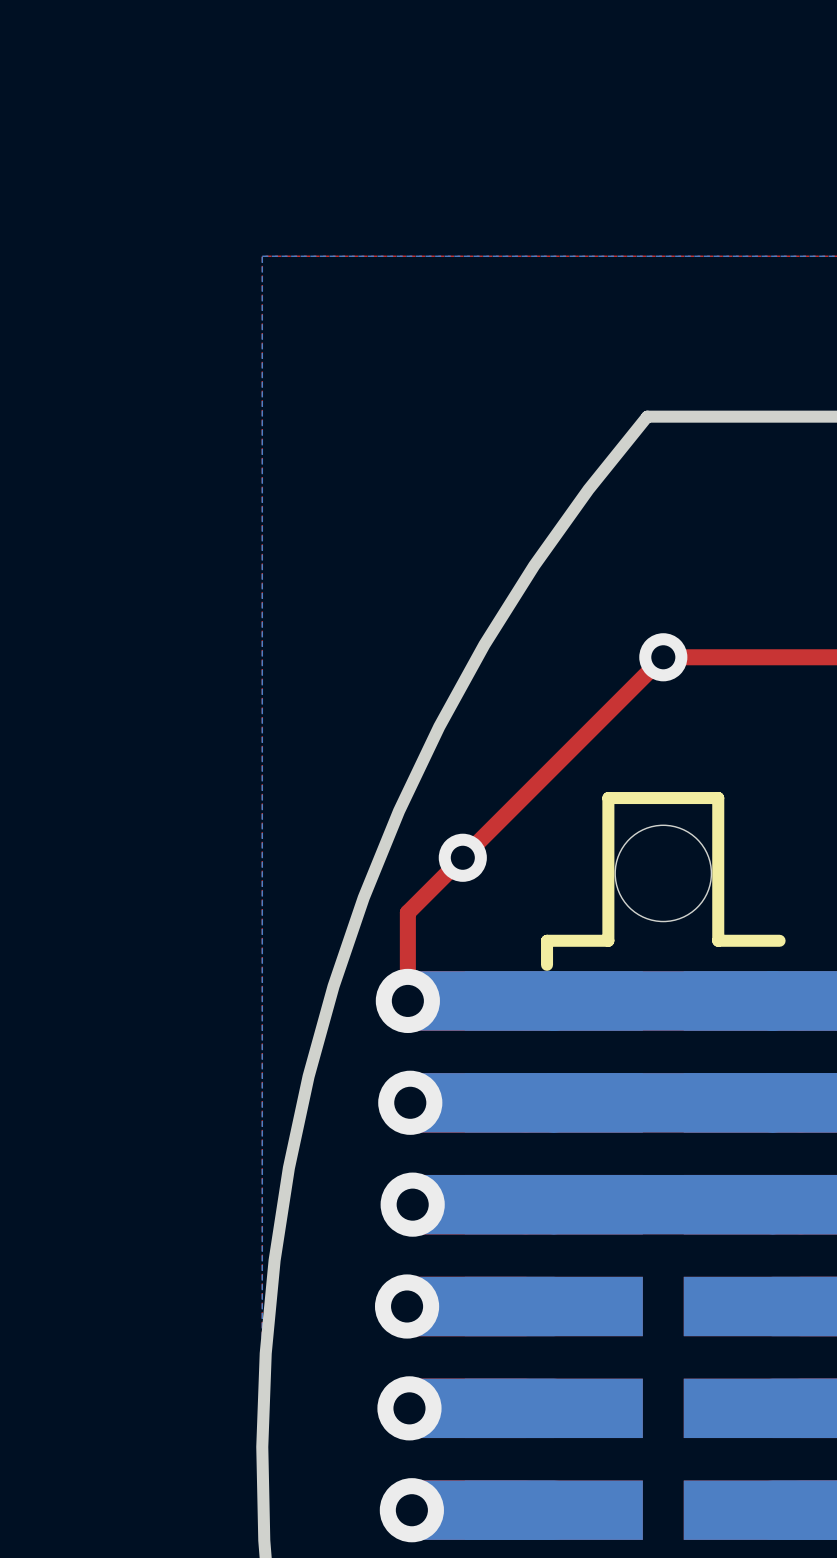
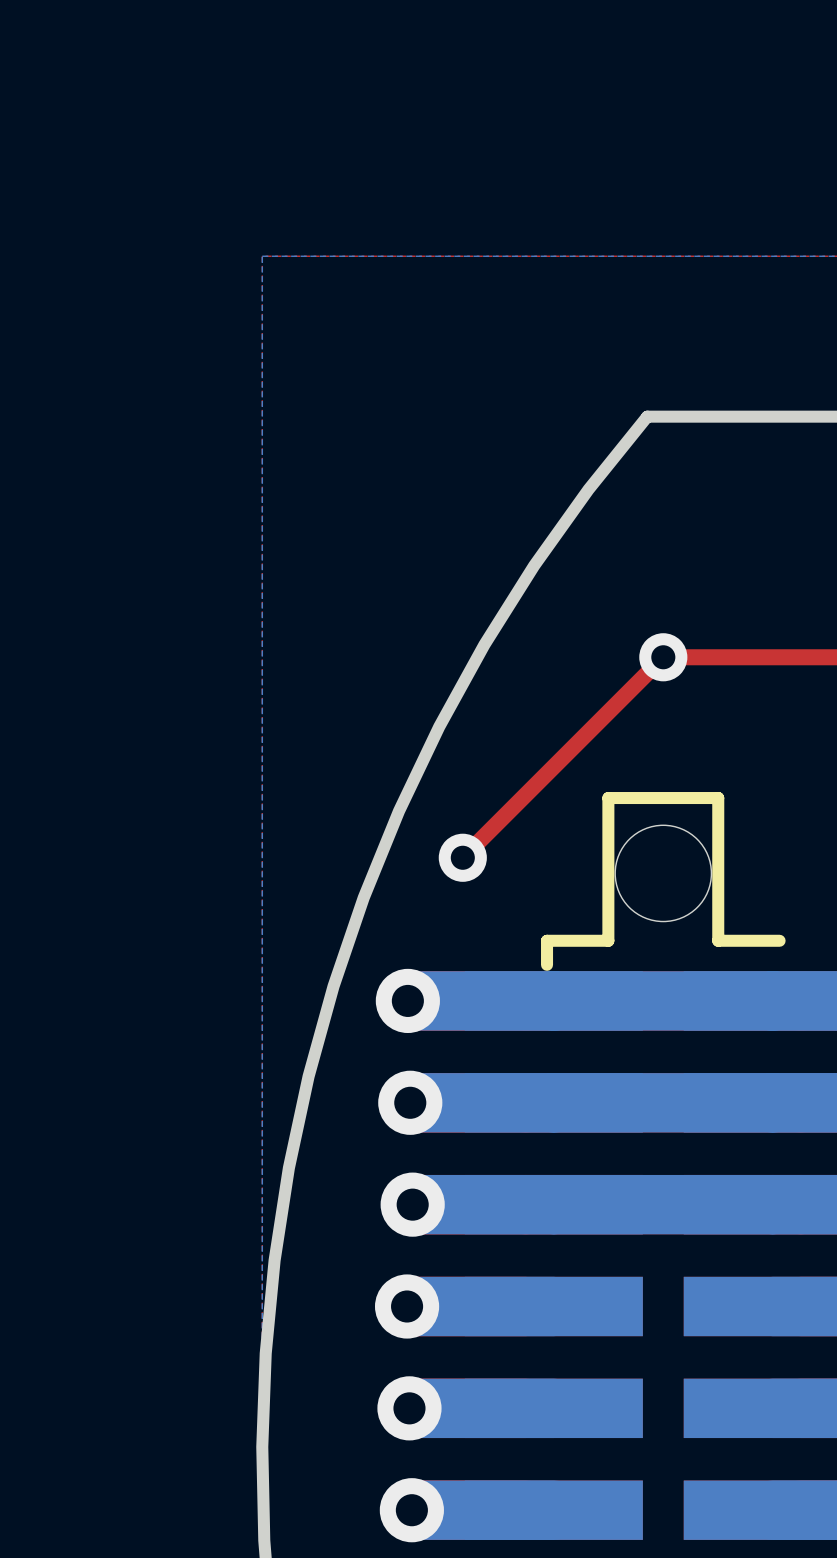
top track: (462, 857) (407, 912) (407, 1000) -> none

